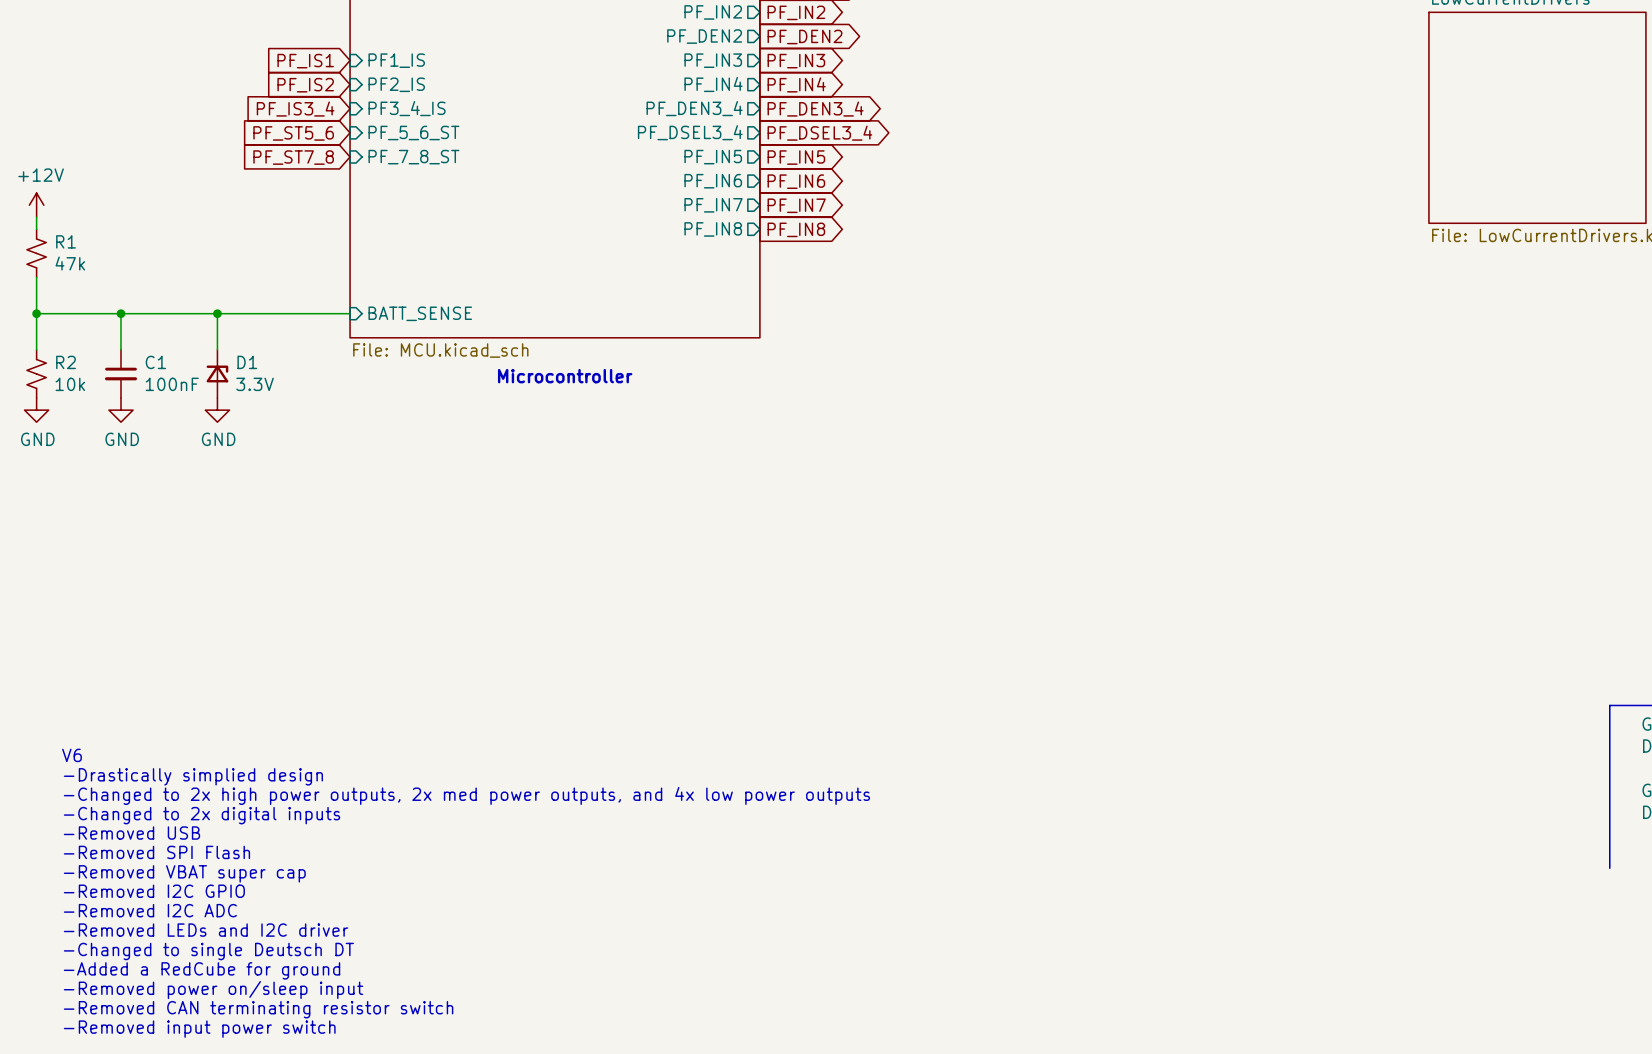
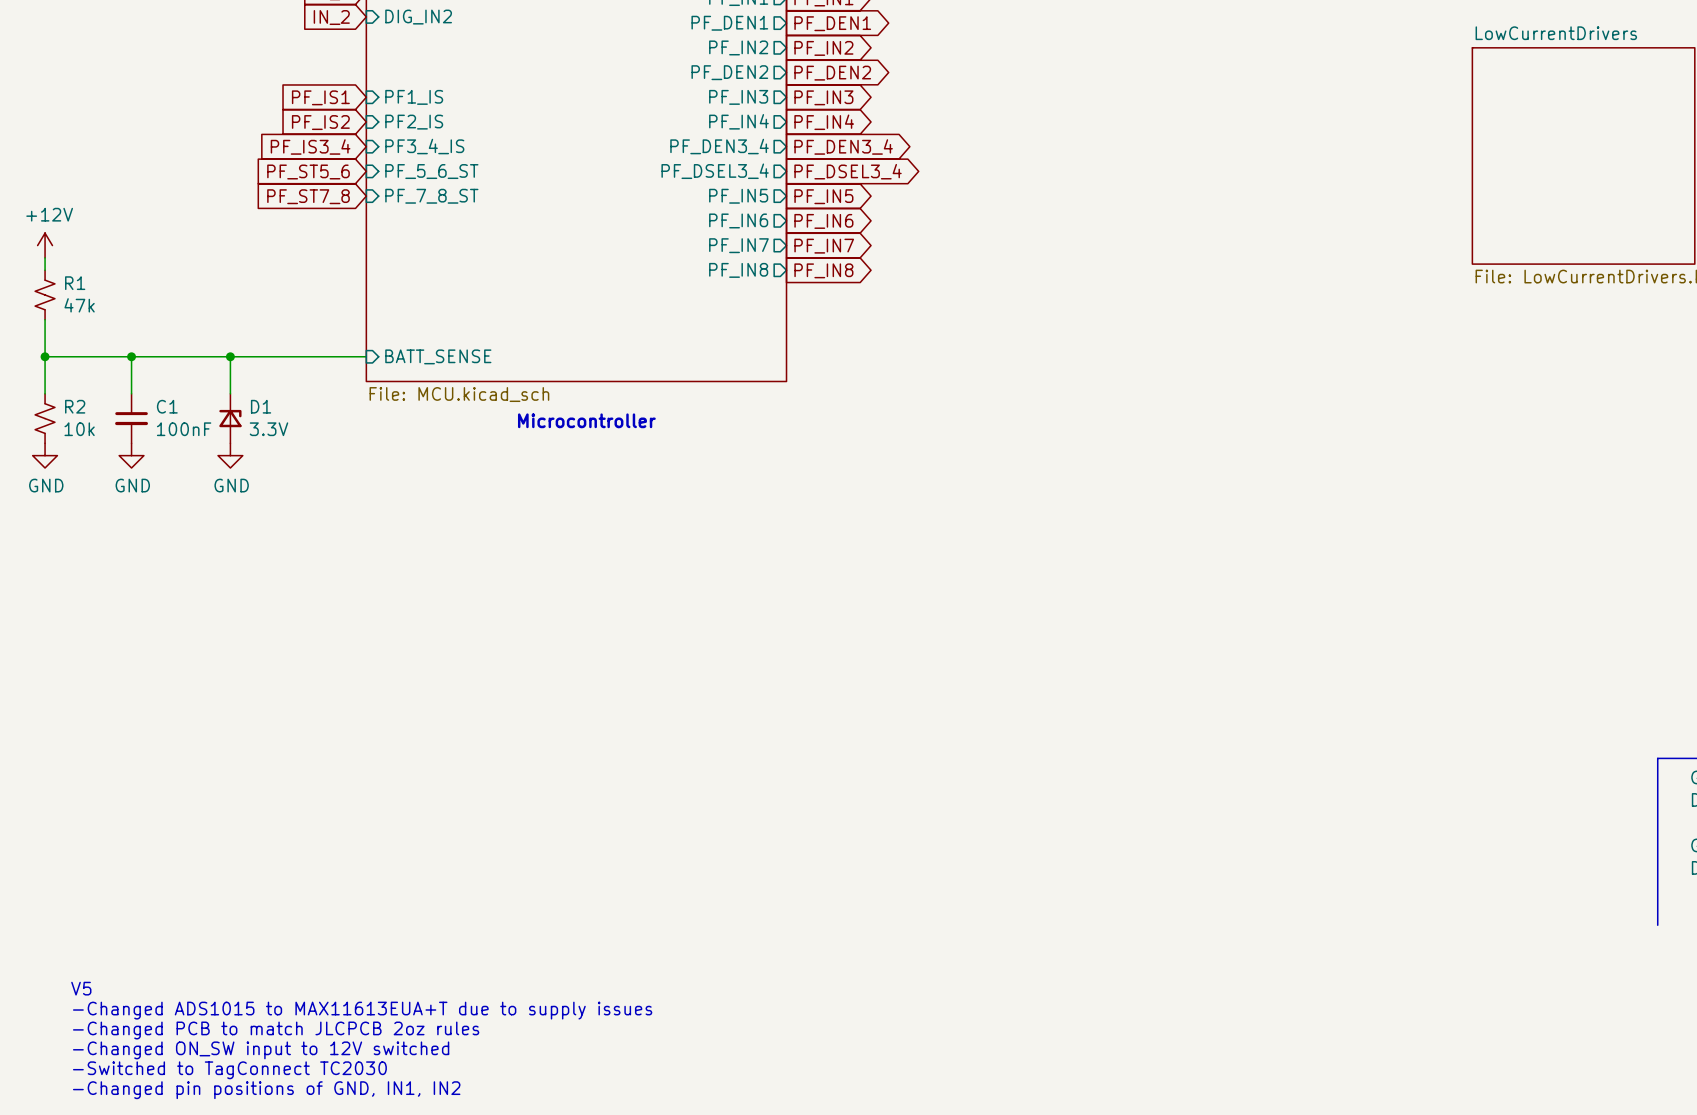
text: V6 (72, 755) -> none
text: -Drastically simplied design (193, 776) -> none
text: -Changed to 2x high power outputs, 2x med power outputs, and 4x low power outputs (466, 795) -> none
text: -Changed to 2x digital inputs (202, 815) -> none
text: -Removed USB (131, 833) -> none
text: -Removed SPI Flash (156, 852) -> none
text: -Removed VBAT super cap (184, 873) -> none
text: -Removed I2C GPIO (154, 891) -> none
text: -Removed I2C ADC (150, 910) -> none
text: -Removed LEDs and I2C driver (206, 930) -> V5 (81, 988)
text: -Changed to single Deutsch DT (208, 951) -> -Changed ADS1015 to MAX11613EUA+T due to supply issues (362, 1010)
text: -Added a RedCube for ground (202, 970) -> -Changed PCB to match JLCPCB 2oz rules (276, 1030)
text: -Removed power on/sleep input (213, 990) -> -Changed ON_SW input to 12V switched (261, 1050)
text: -Removed CAN terminating resistor switch (258, 1009) -> -Switched to TagConnect TC2030 (229, 1070)
text: -Removed input power switch (199, 1029) -> -Changed pin positions of GND, IN1, IN2 (266, 1090)

